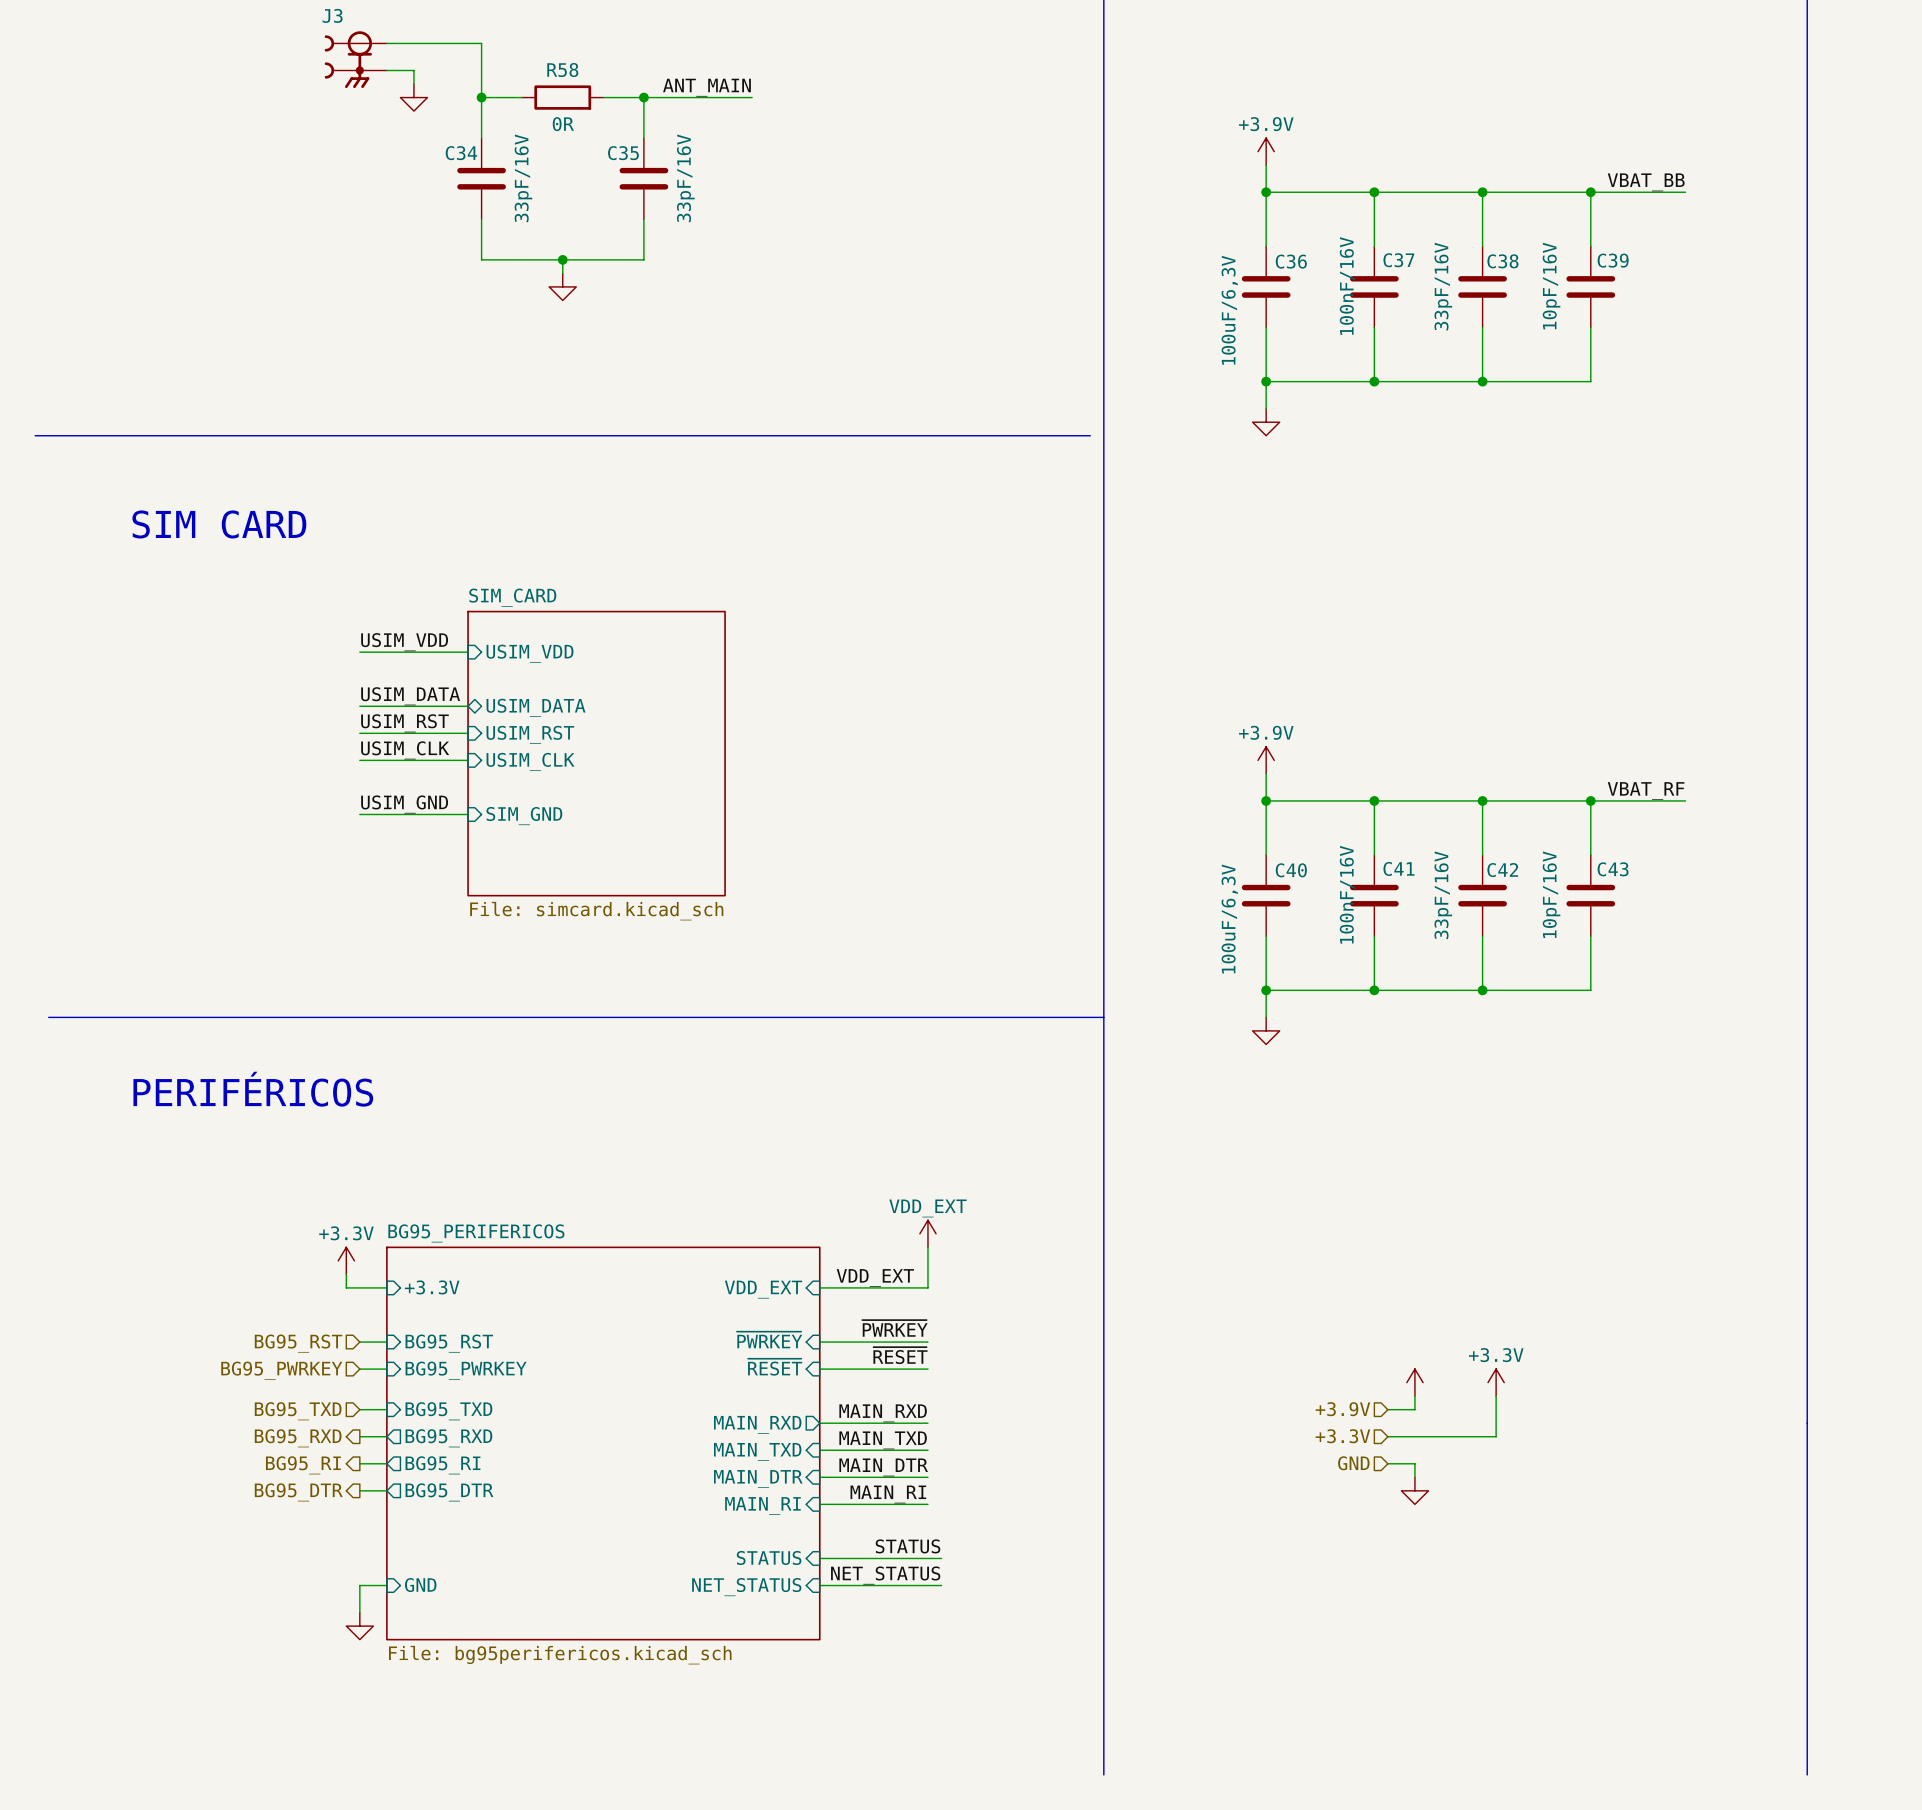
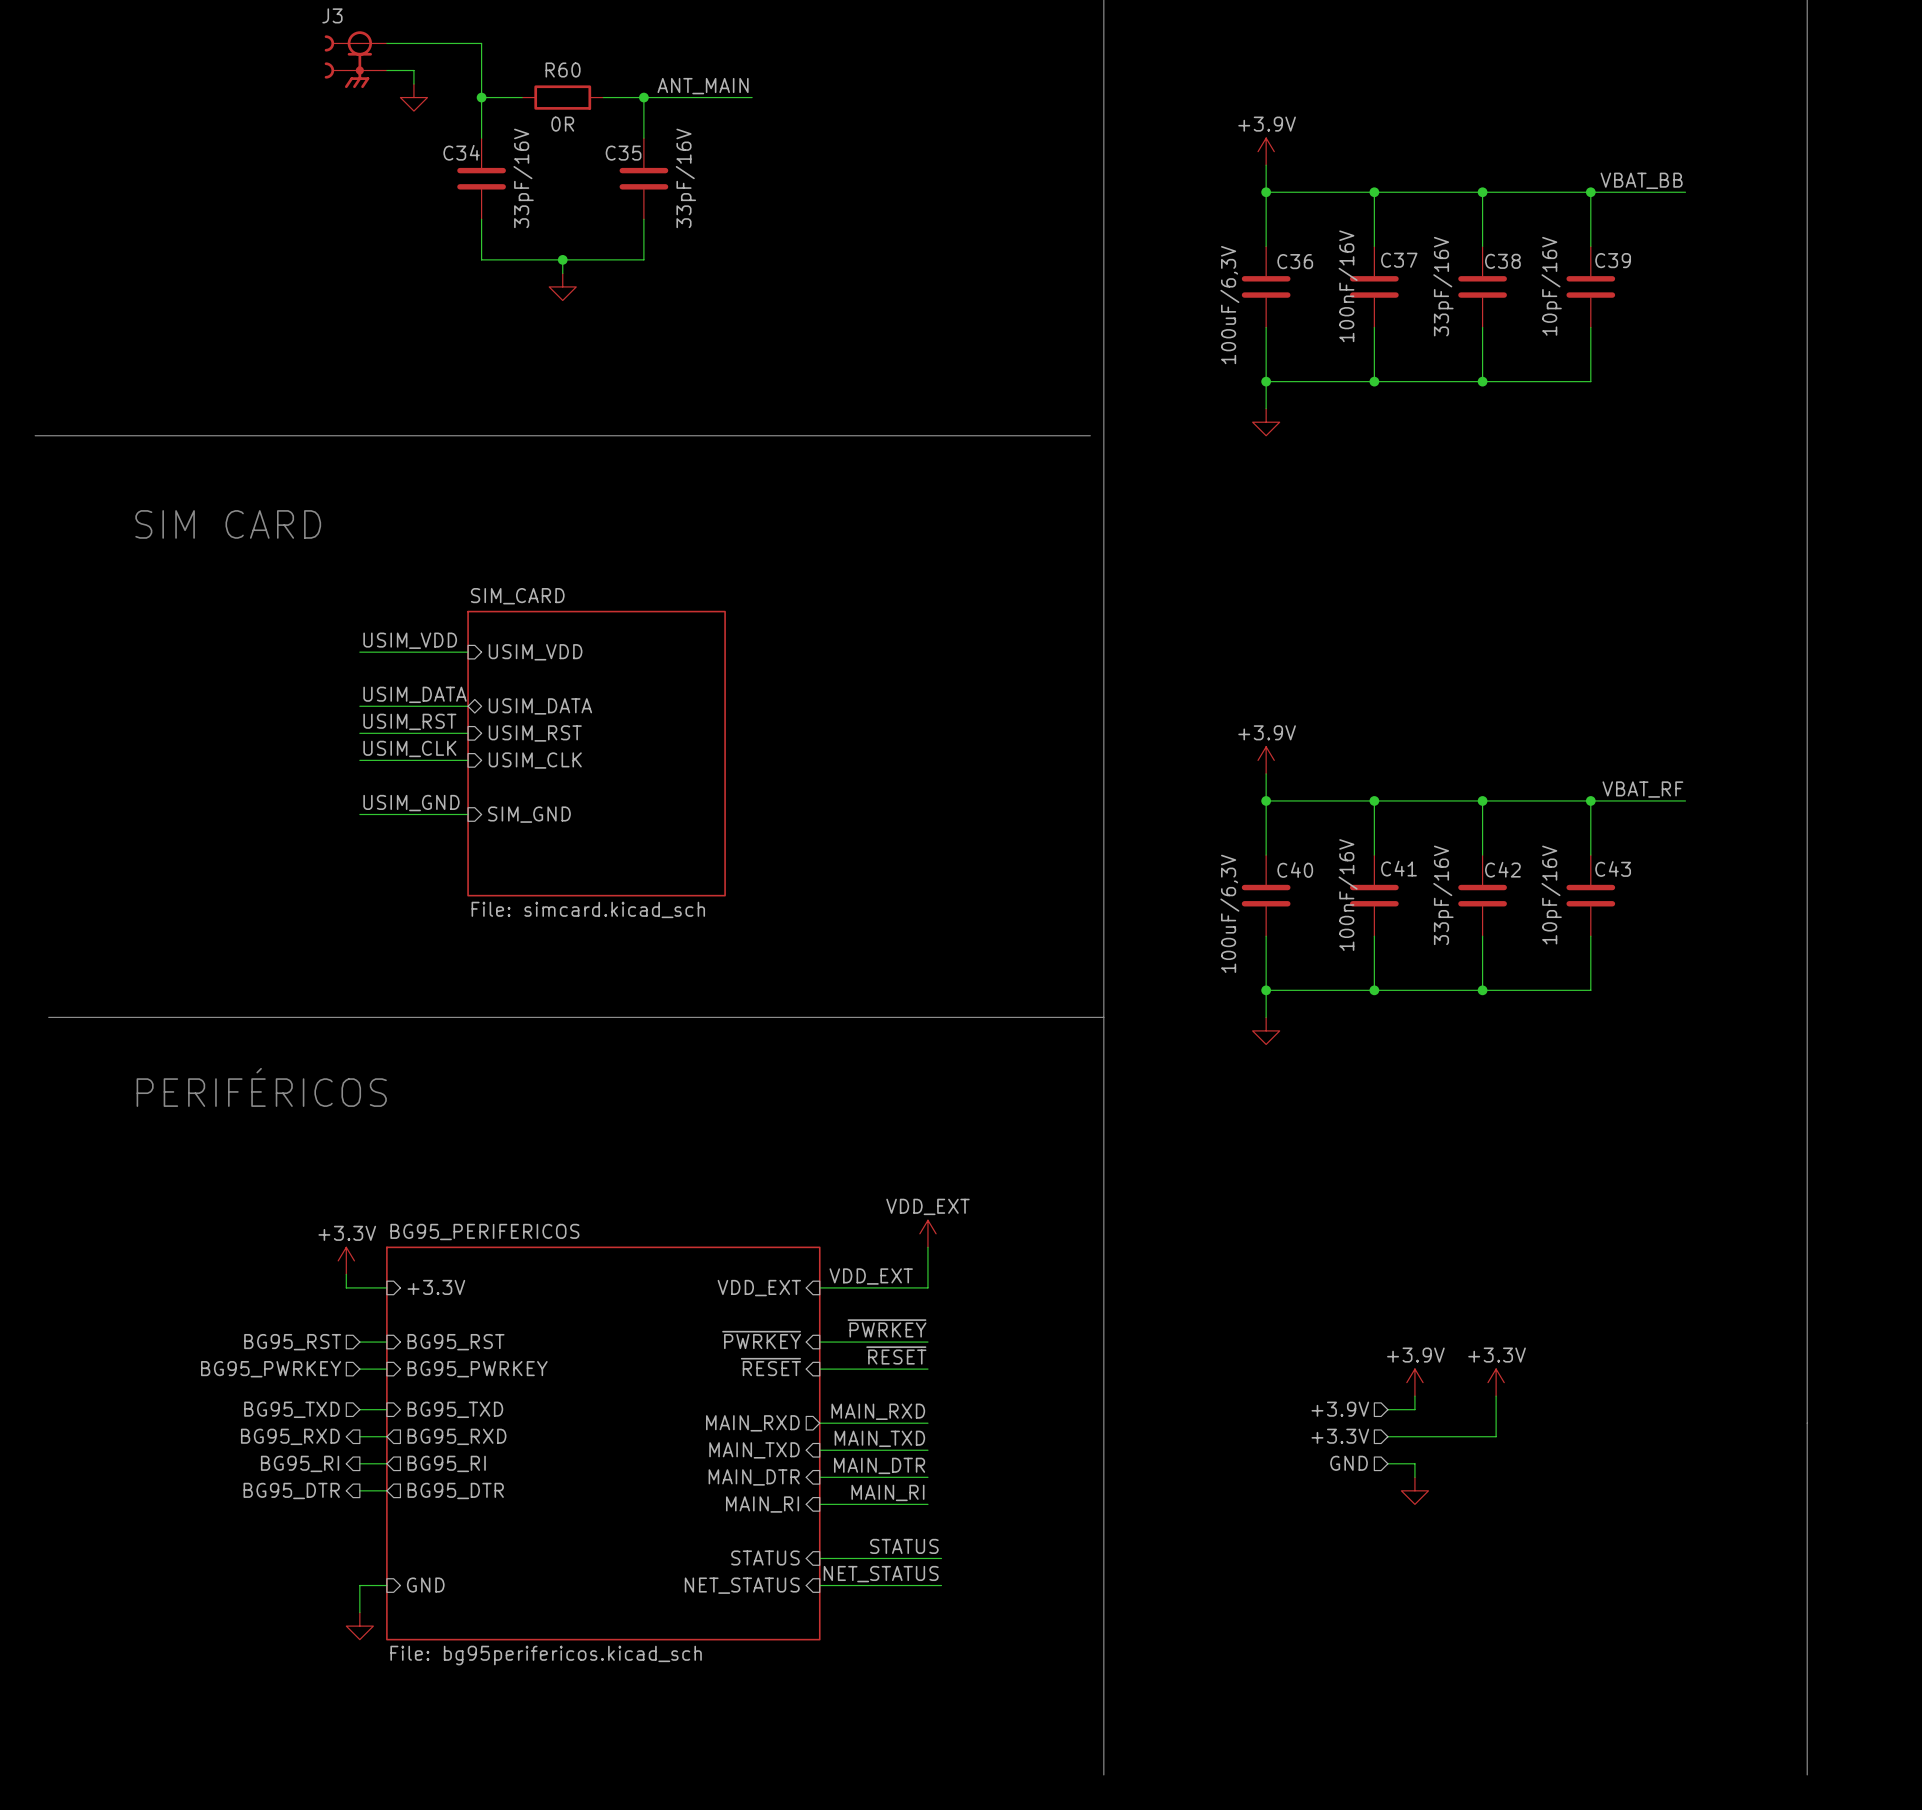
R58 name: R58 (562, 70) -> R60 (563, 70)
power symbol text: none -> +3.9V (1415, 1355)

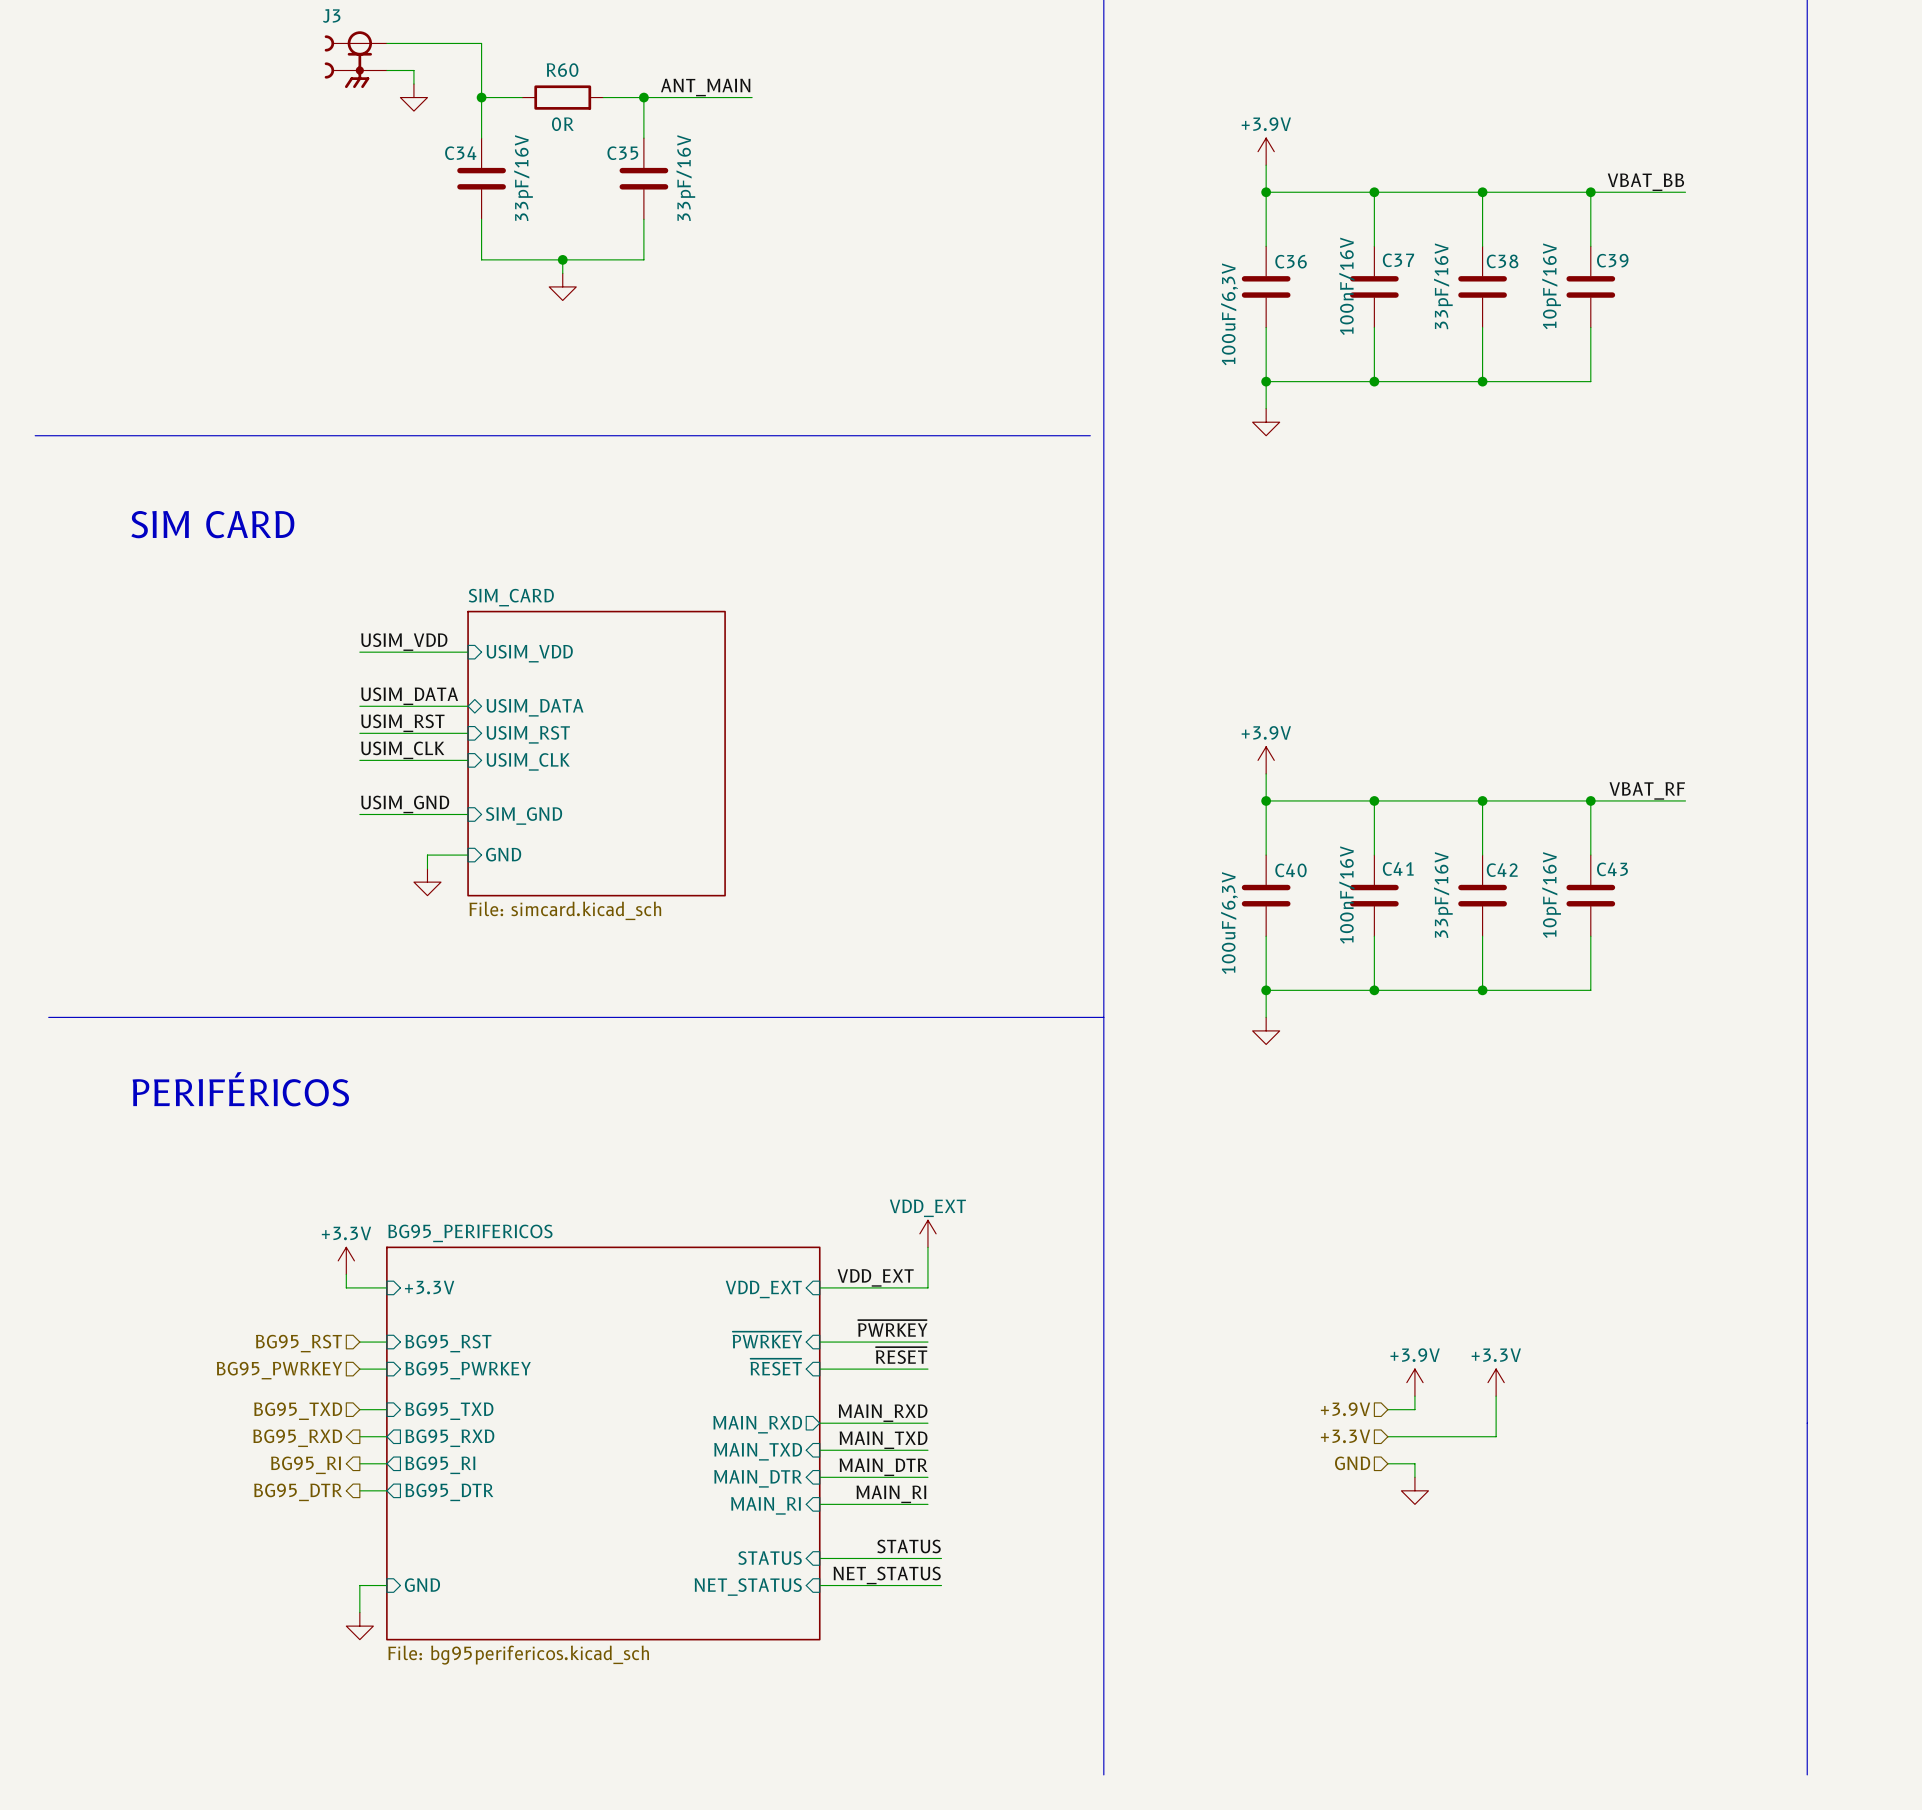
sheet pin: none -> GND (503, 854)
wire: none -> (468, 855) (427, 855) (427, 868)
power symbol: none -> (427, 882)

